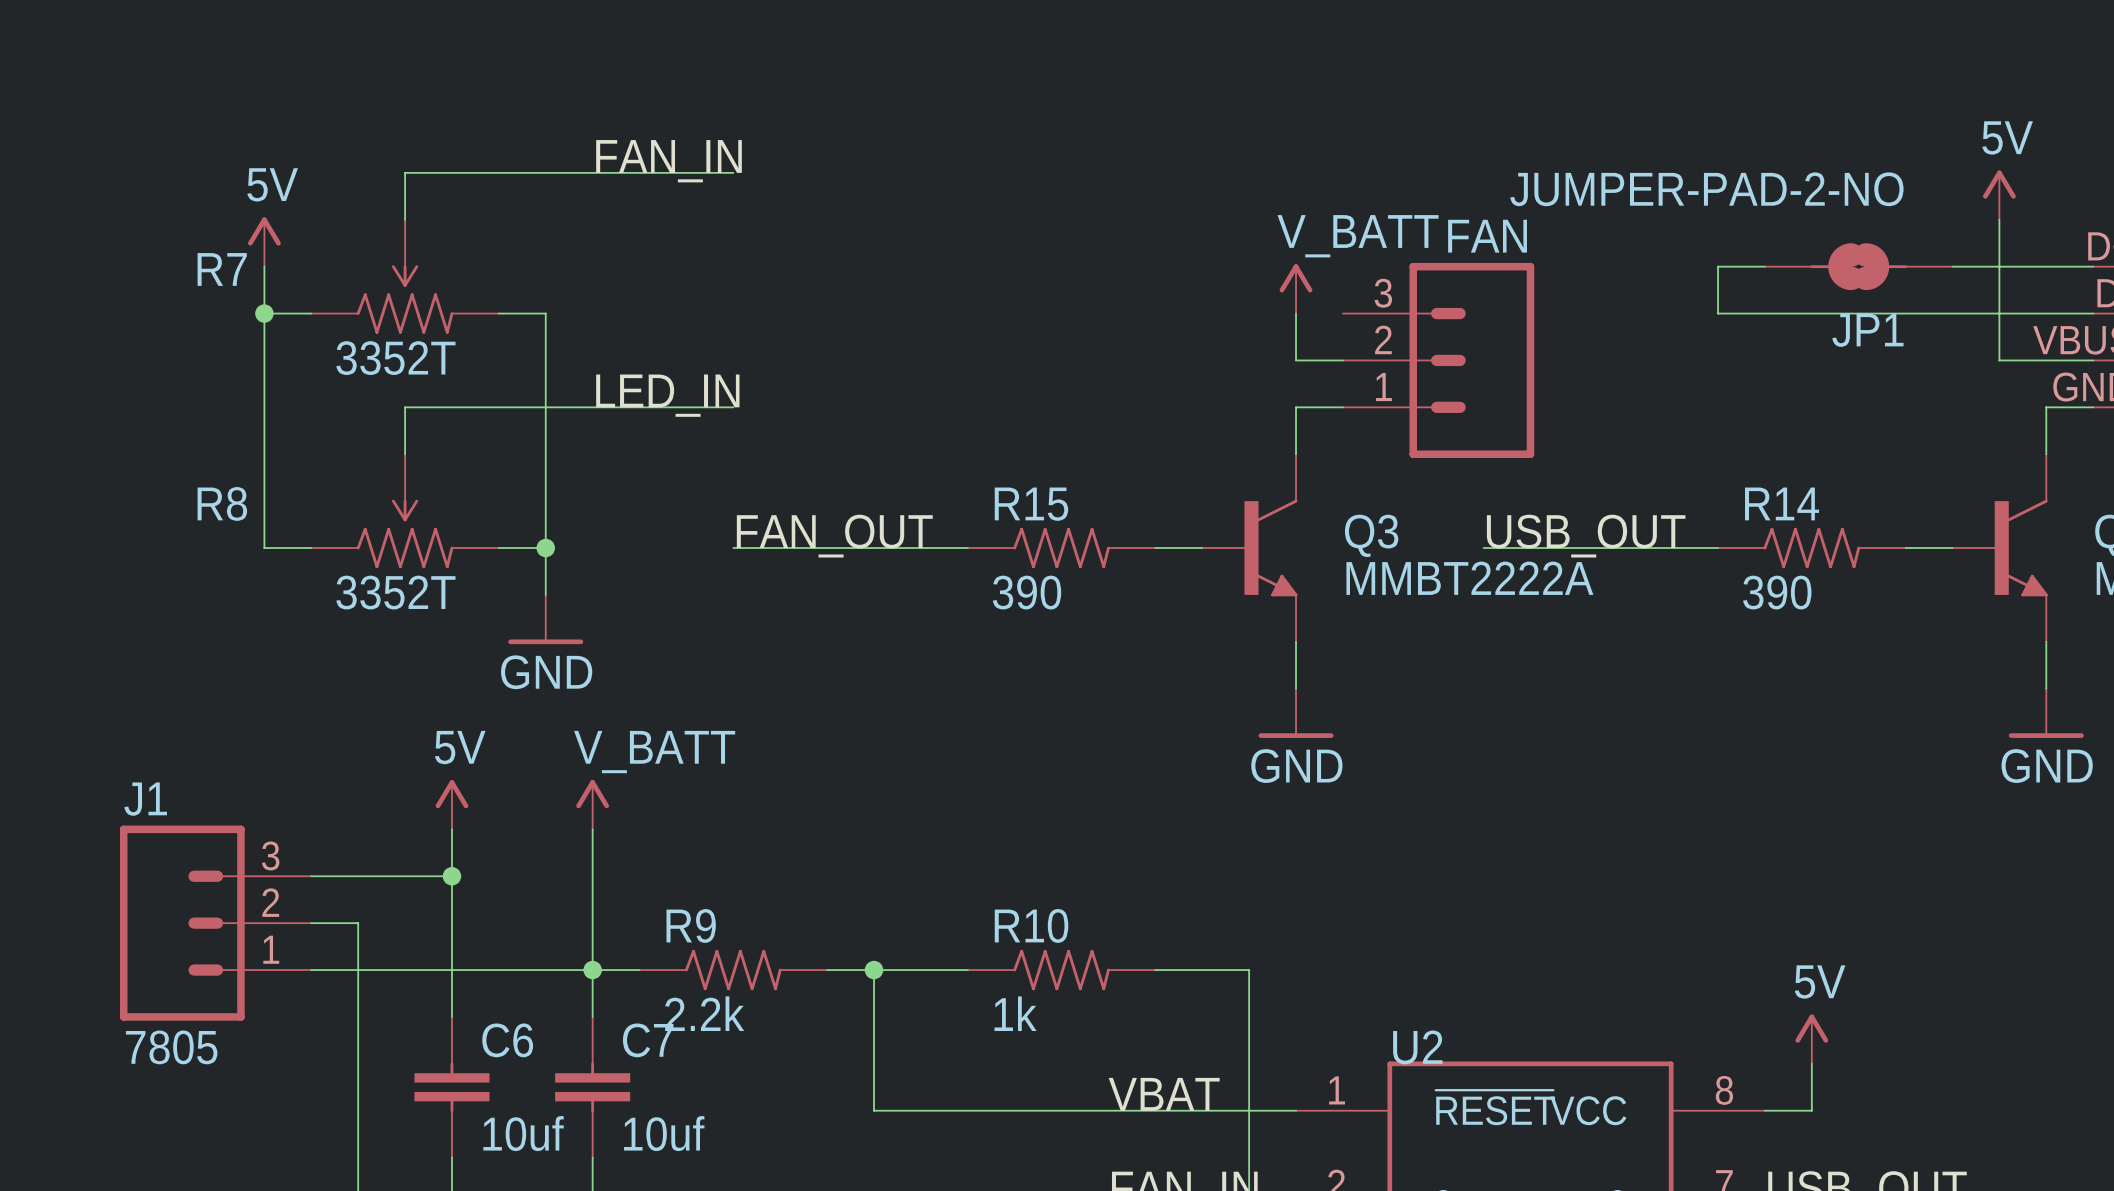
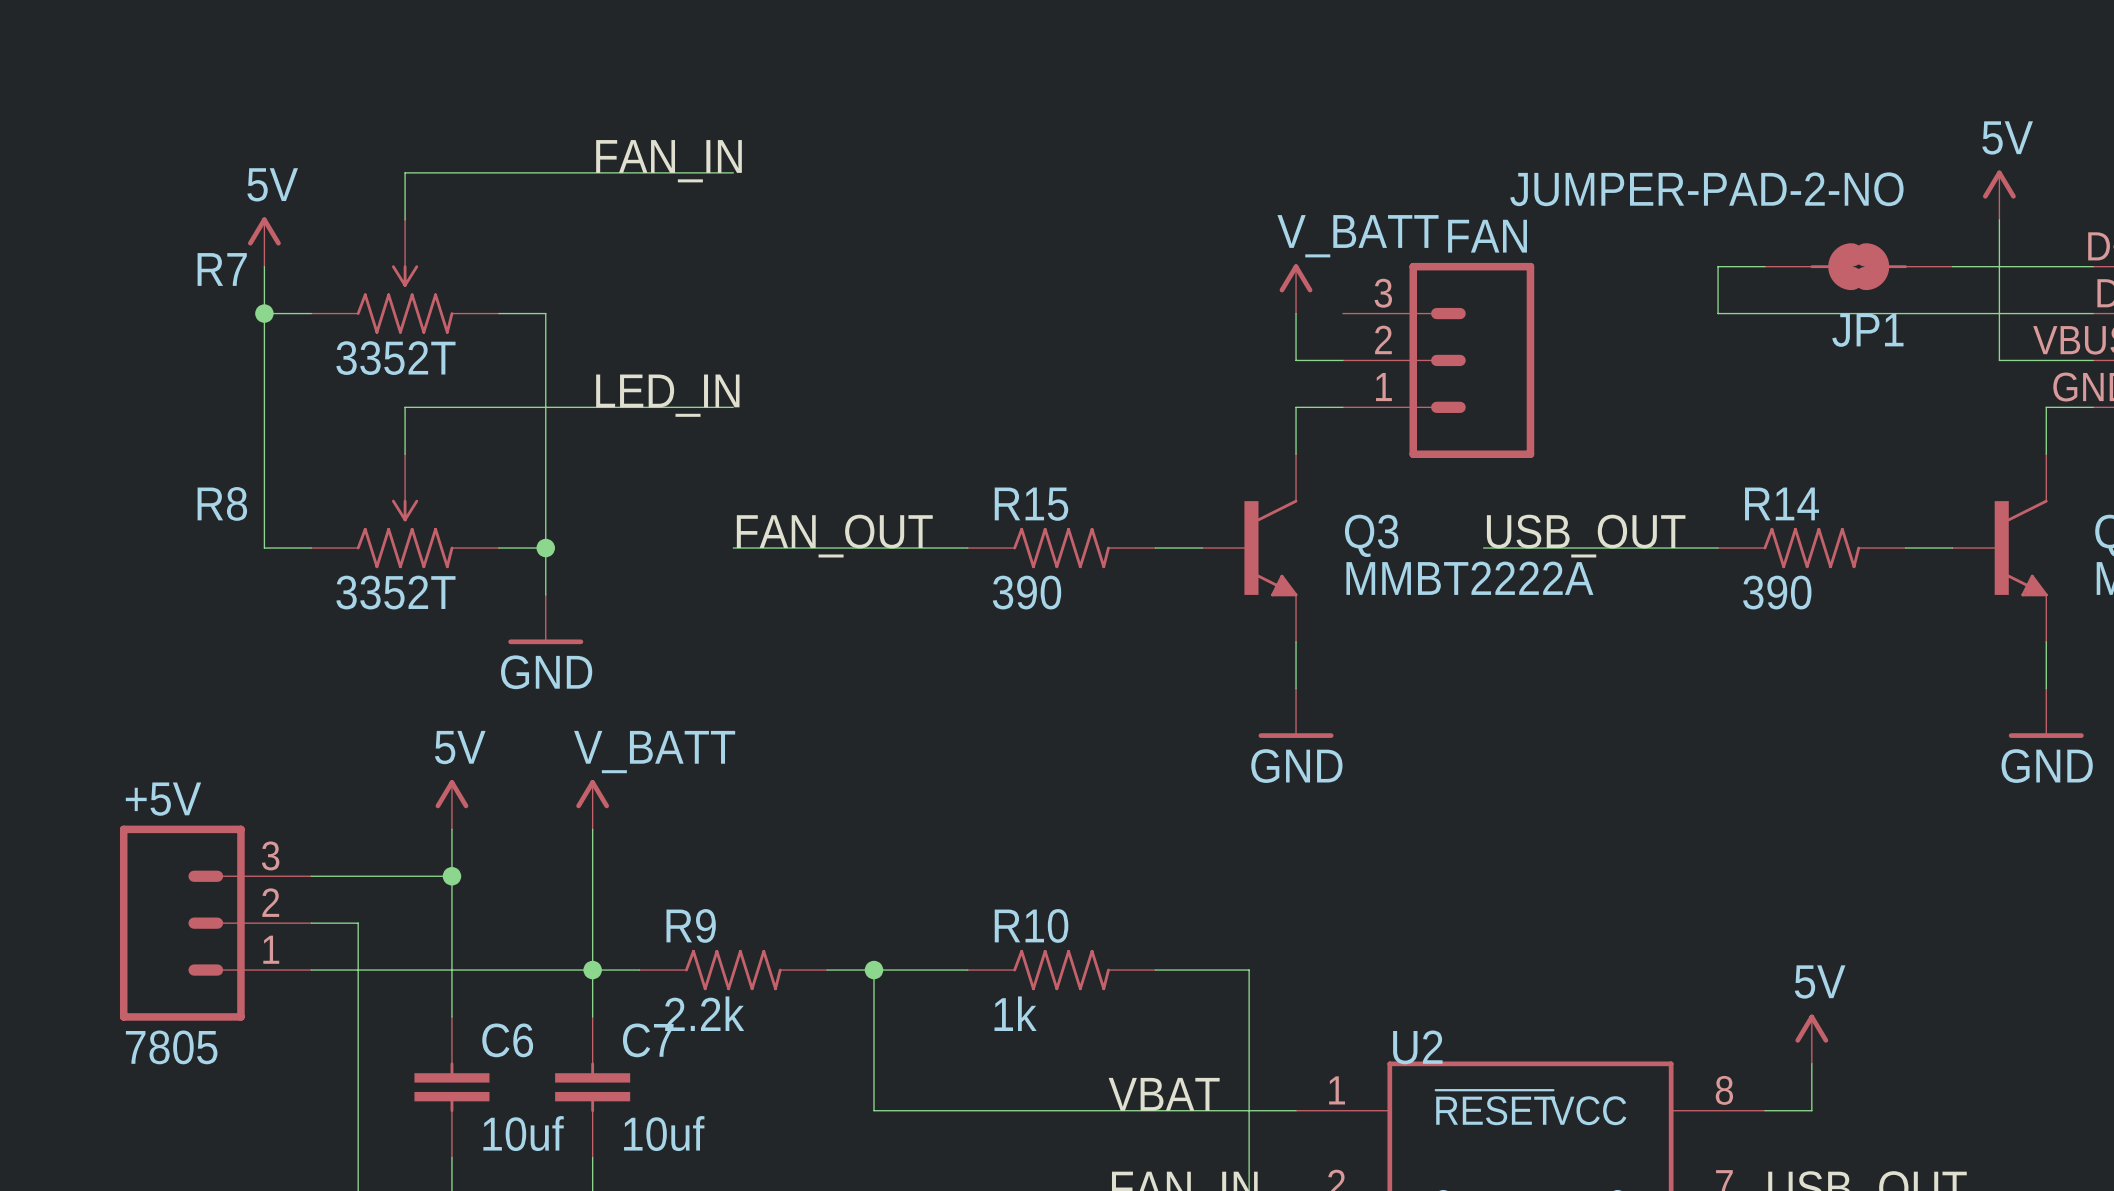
J1 name: J1 (145, 799) -> +5V (163, 799)

